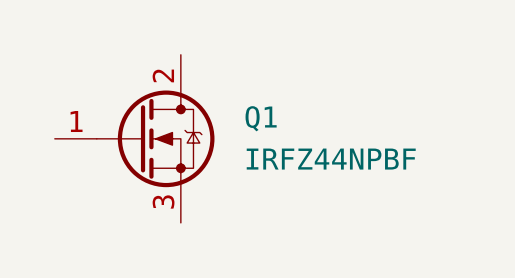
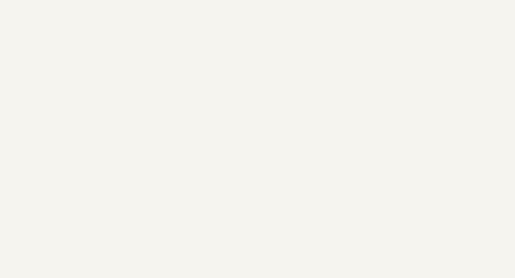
Q1: IRFZ44NPBF (134, 138) -> none

